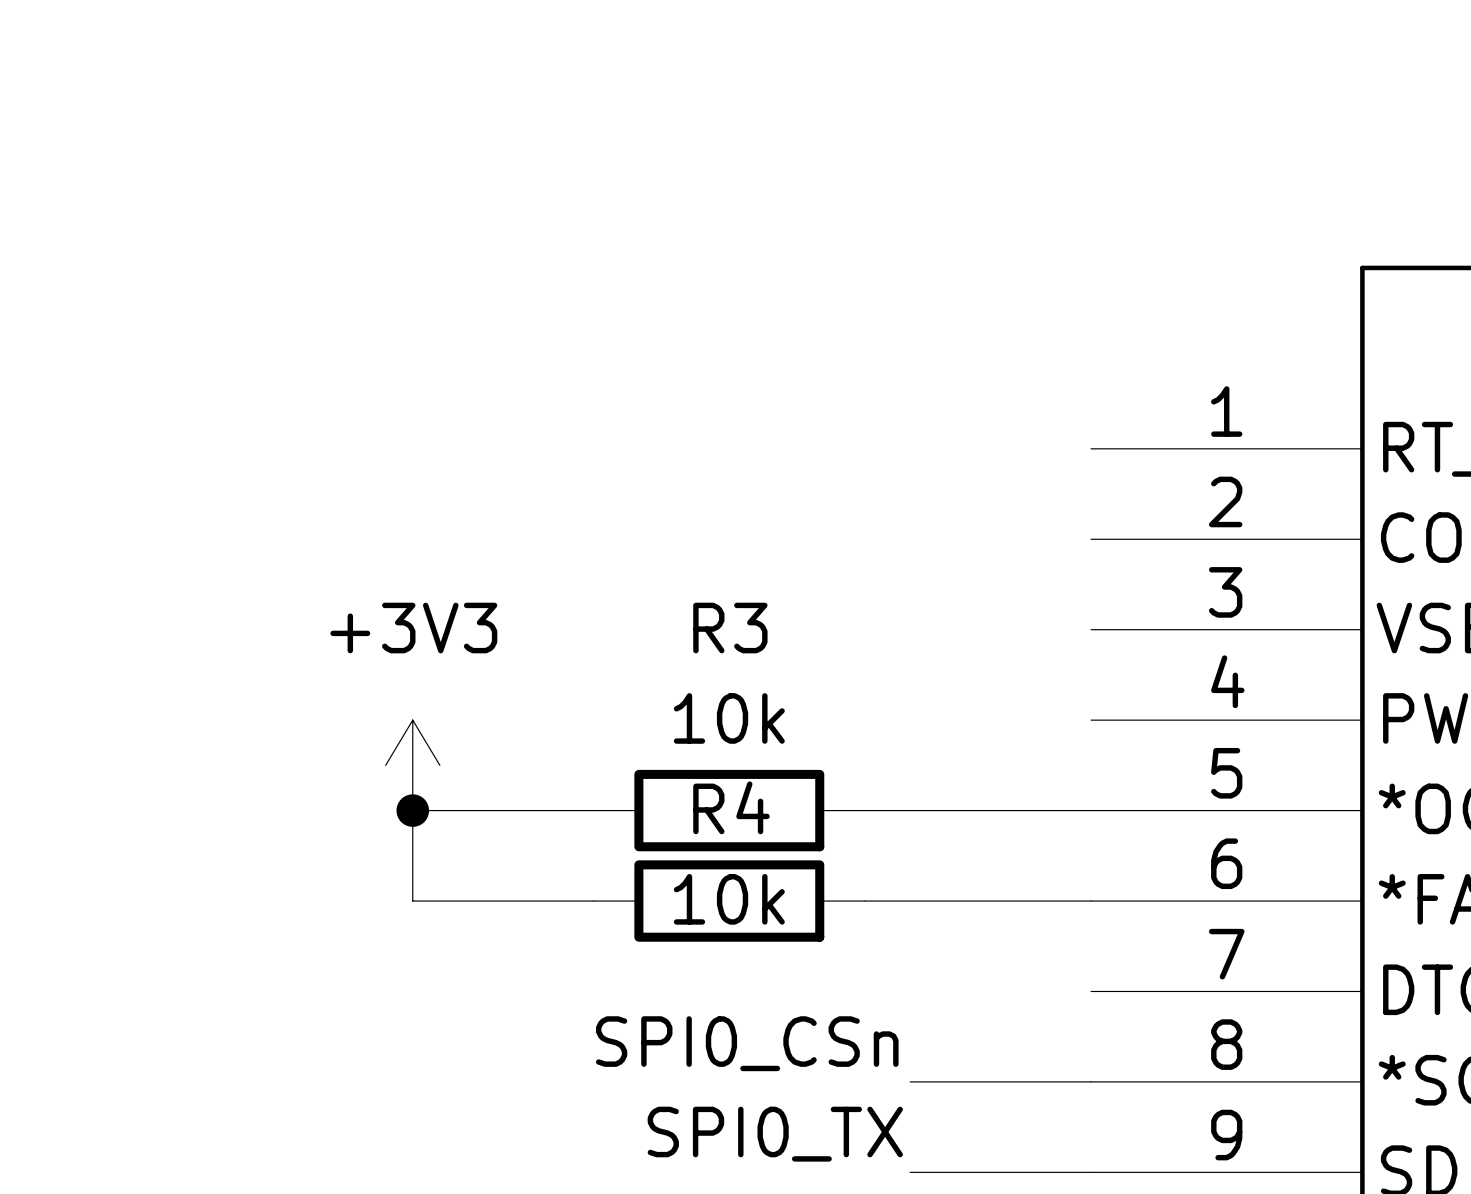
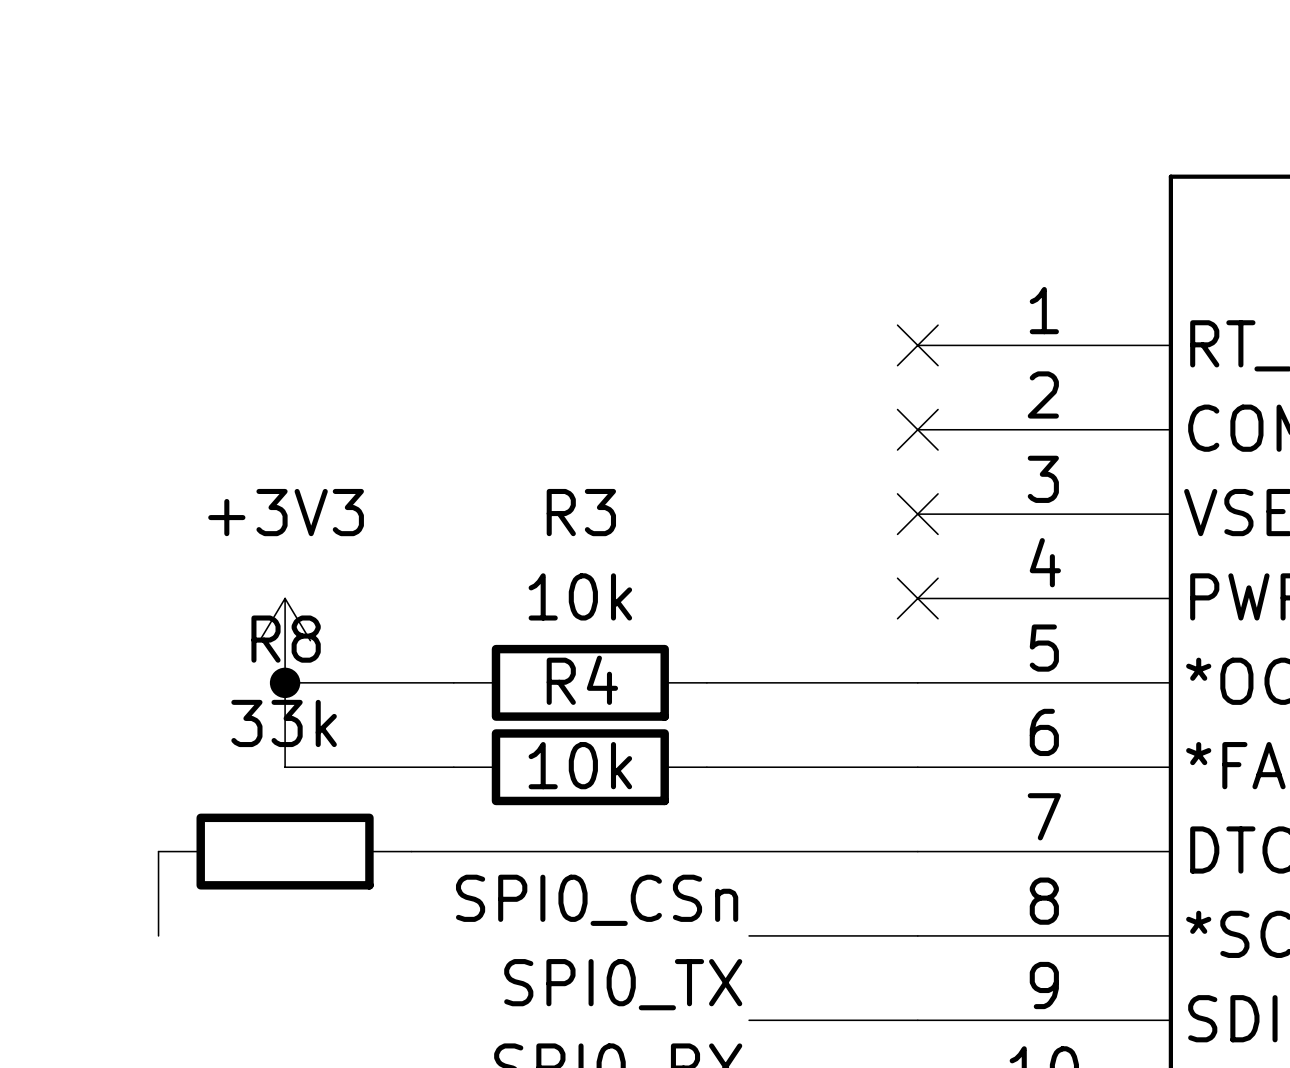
no-connect mark: none -> (917, 345)
no-connect mark: none -> (917, 429)
no-connect mark: none -> (917, 514)
no-connect mark: none -> (917, 598)
wire: none -> (158, 851) (158, 935)
R8: none -> 33k (285, 851)
wire: none -> (411, 851) (917, 851)

